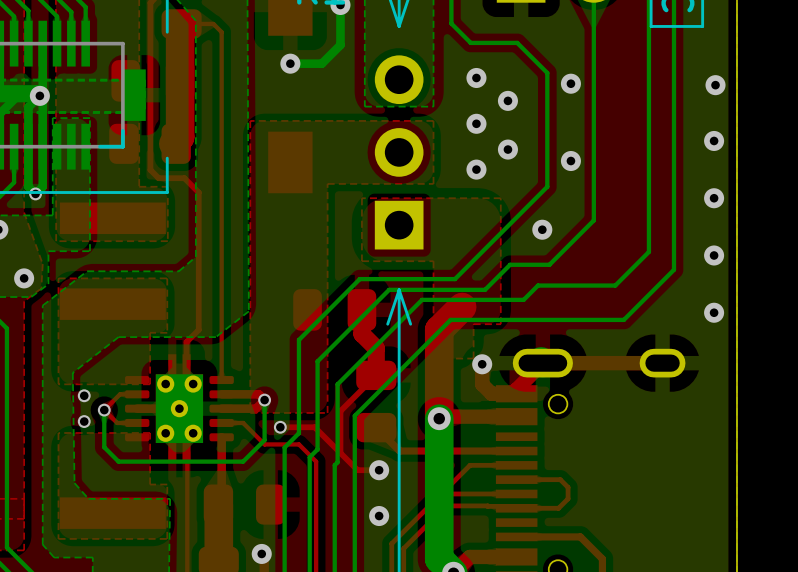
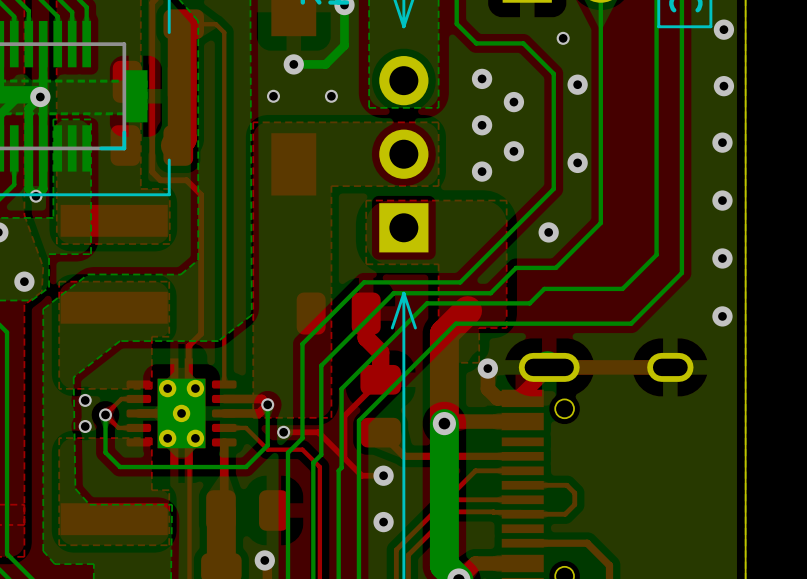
via: none -> (723, 29)
via: none -> (563, 38)
via: none -> (273, 96)
via: none -> (331, 96)

